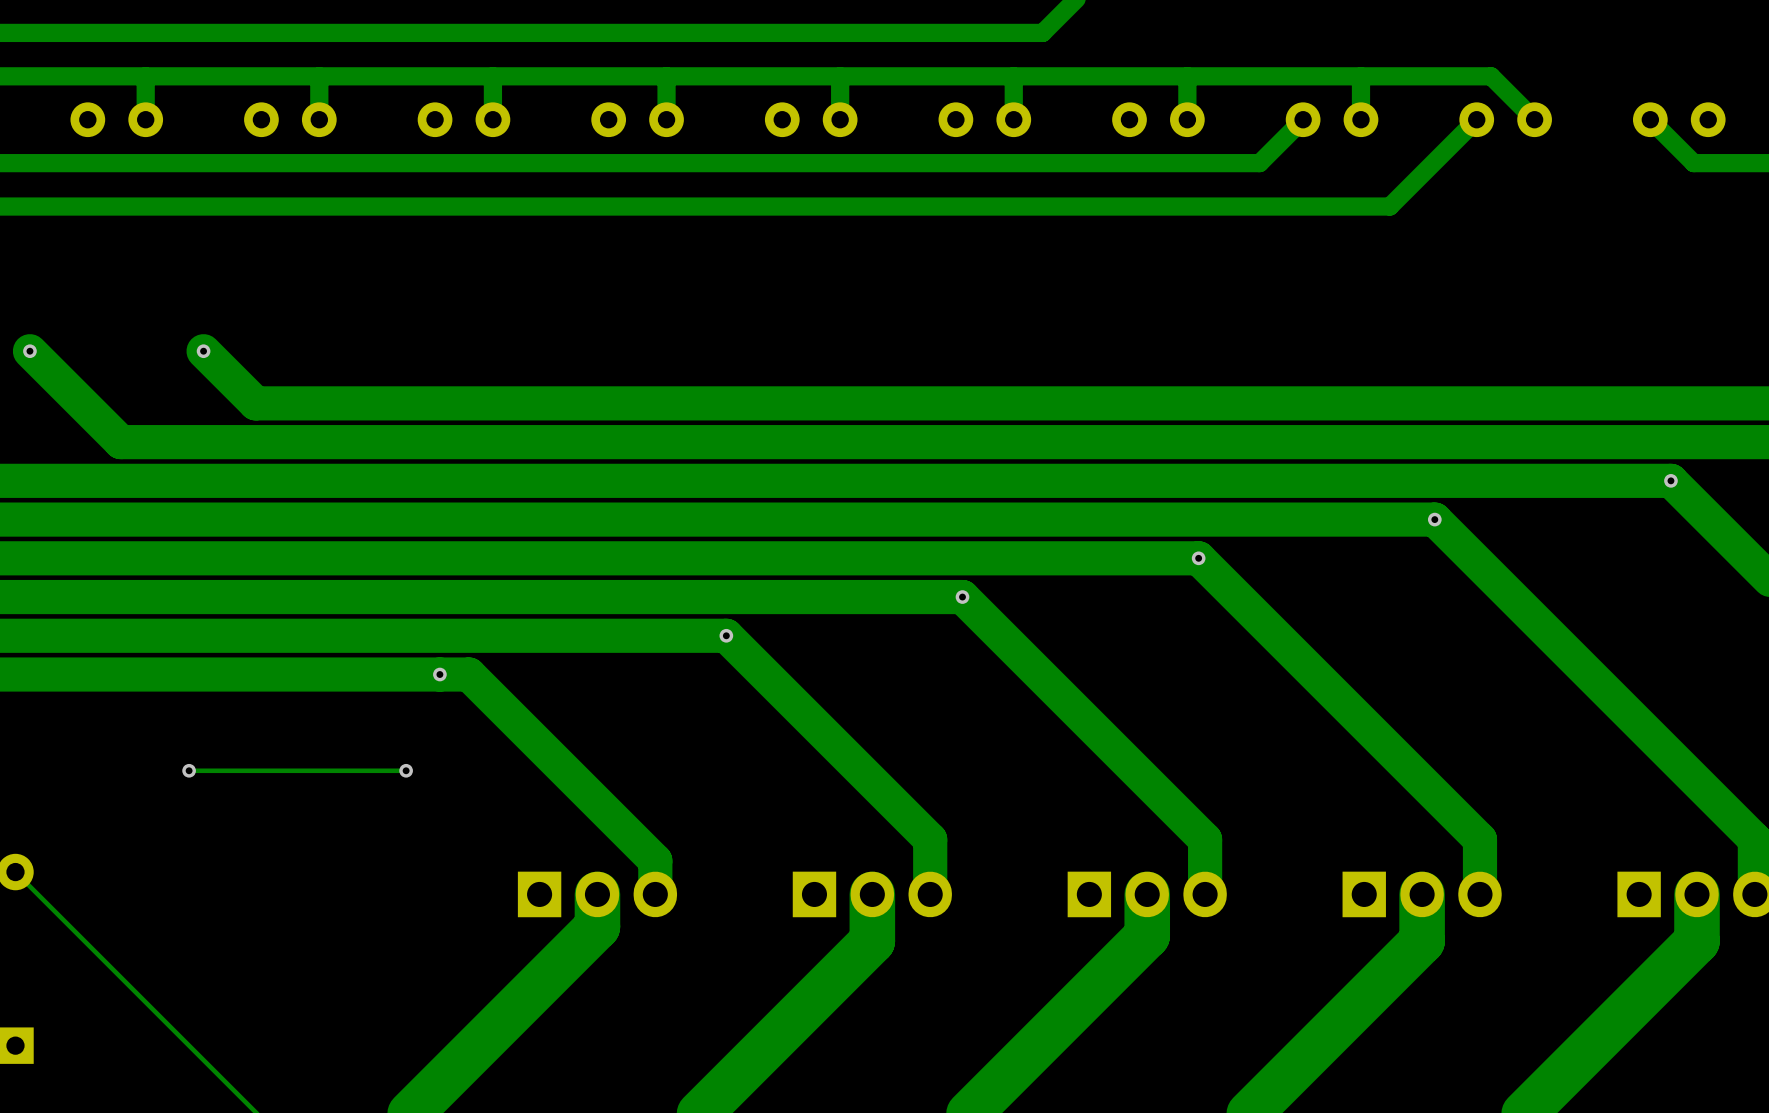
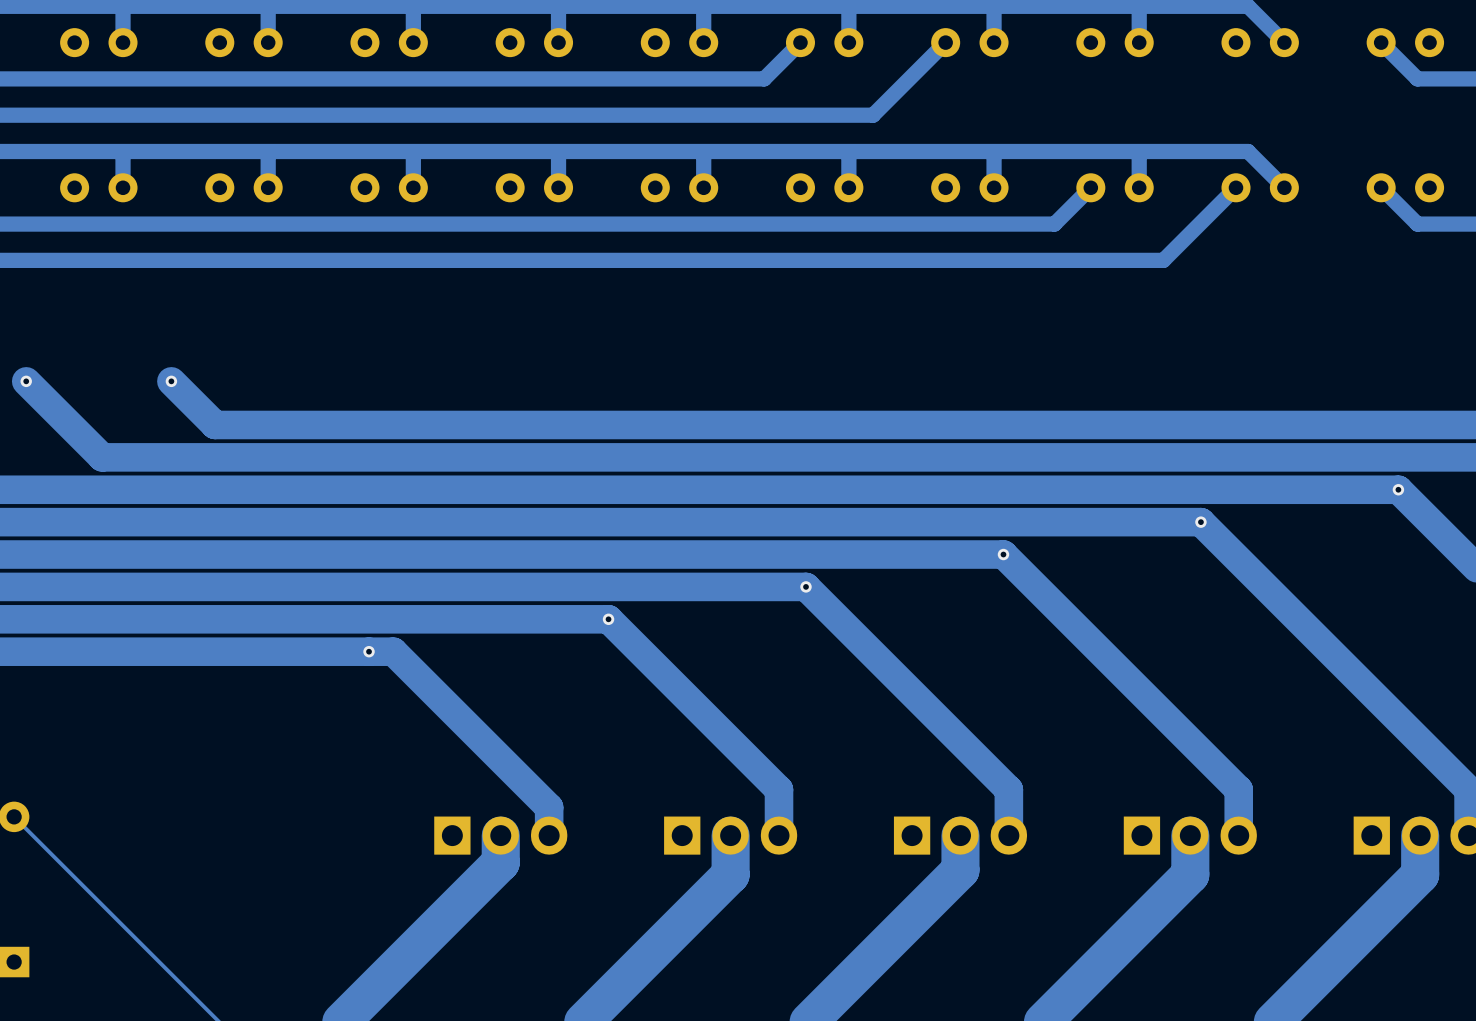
via: (189, 770) -> none
track: (406, 770) (189, 770) -> none
via: (406, 770) -> none

